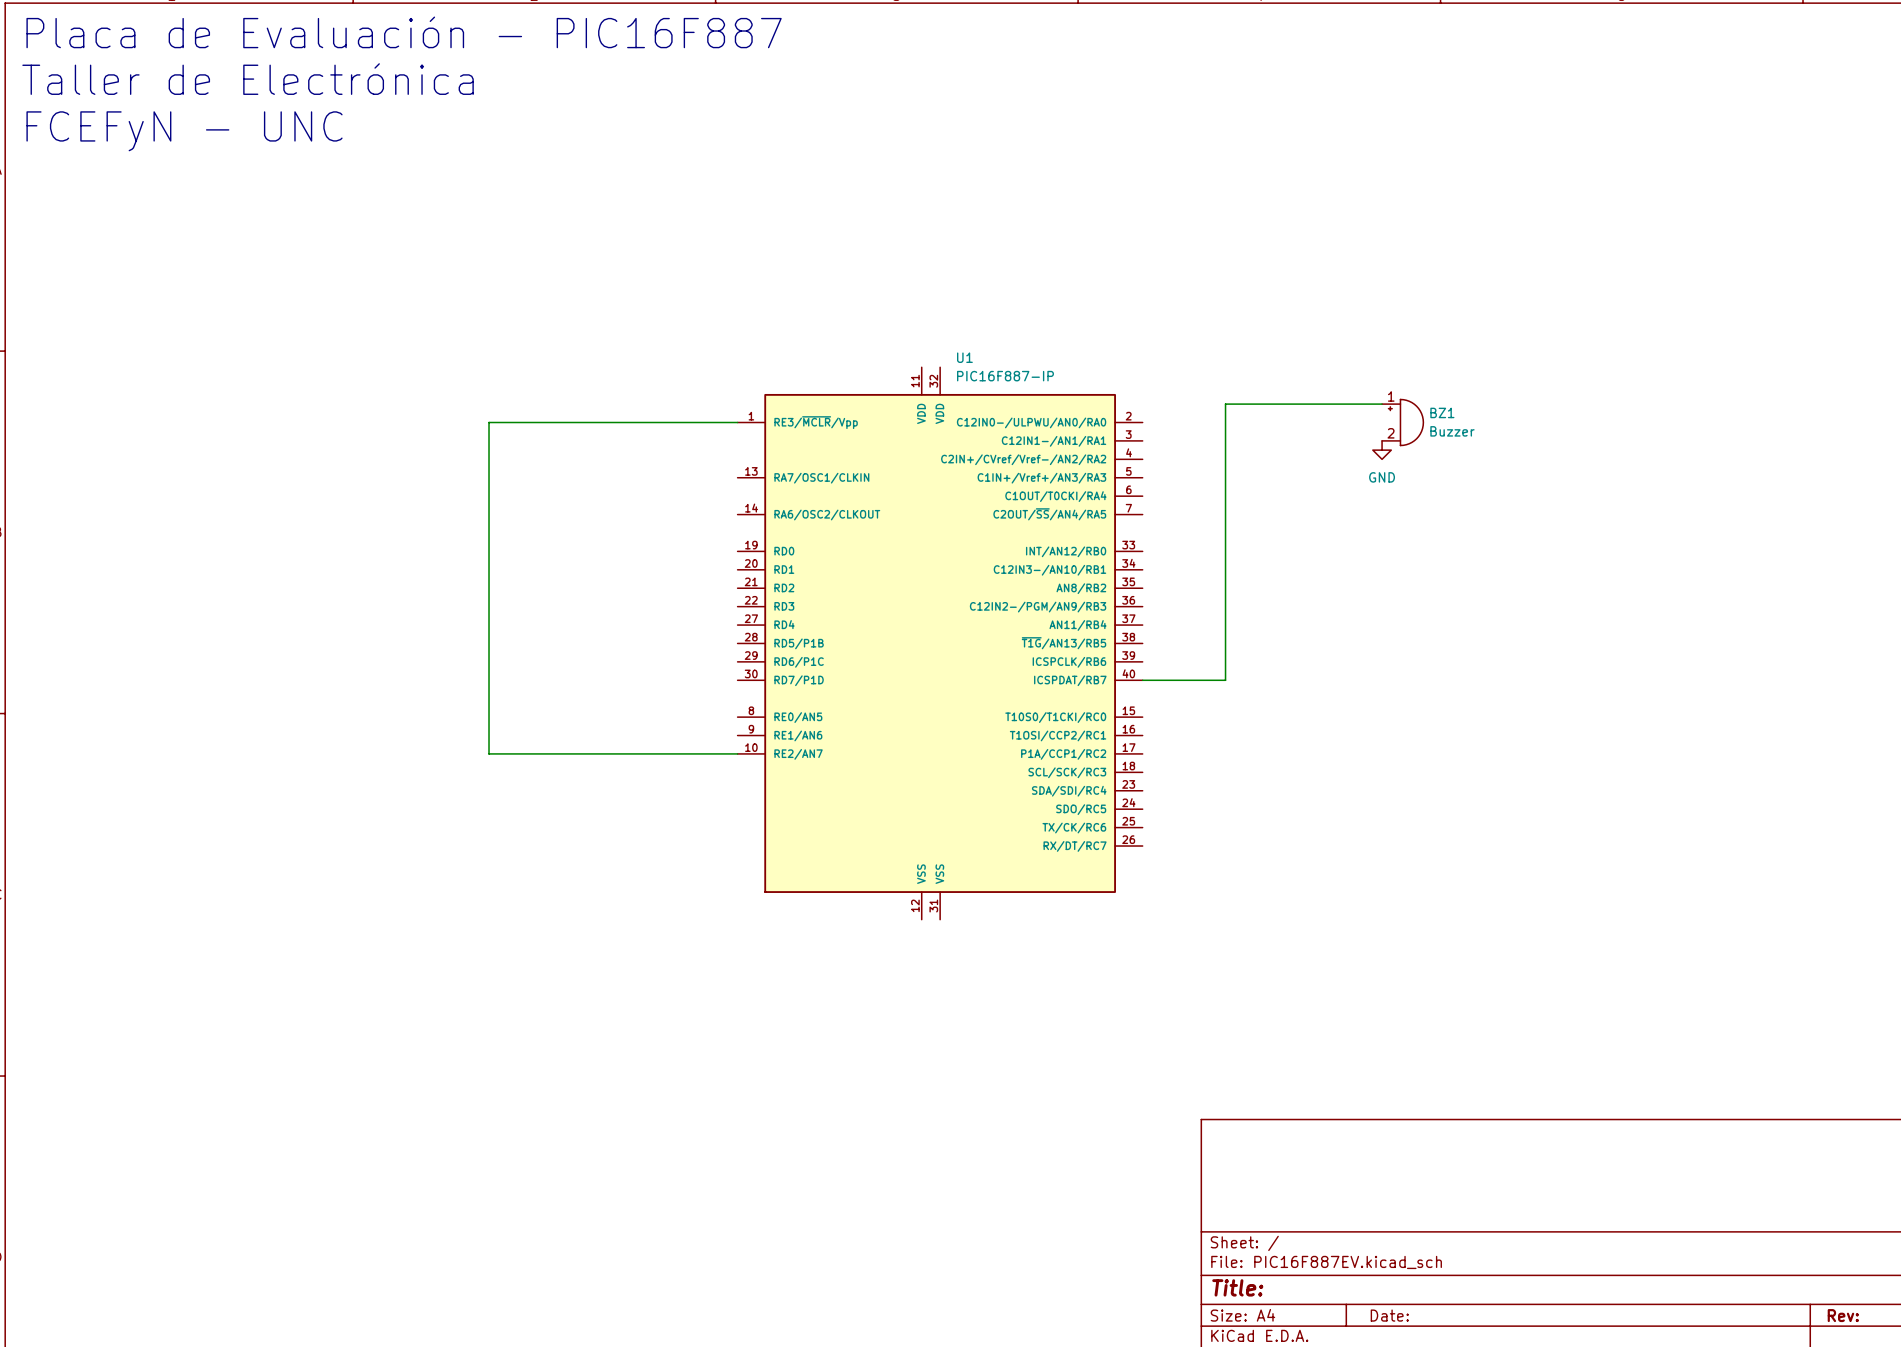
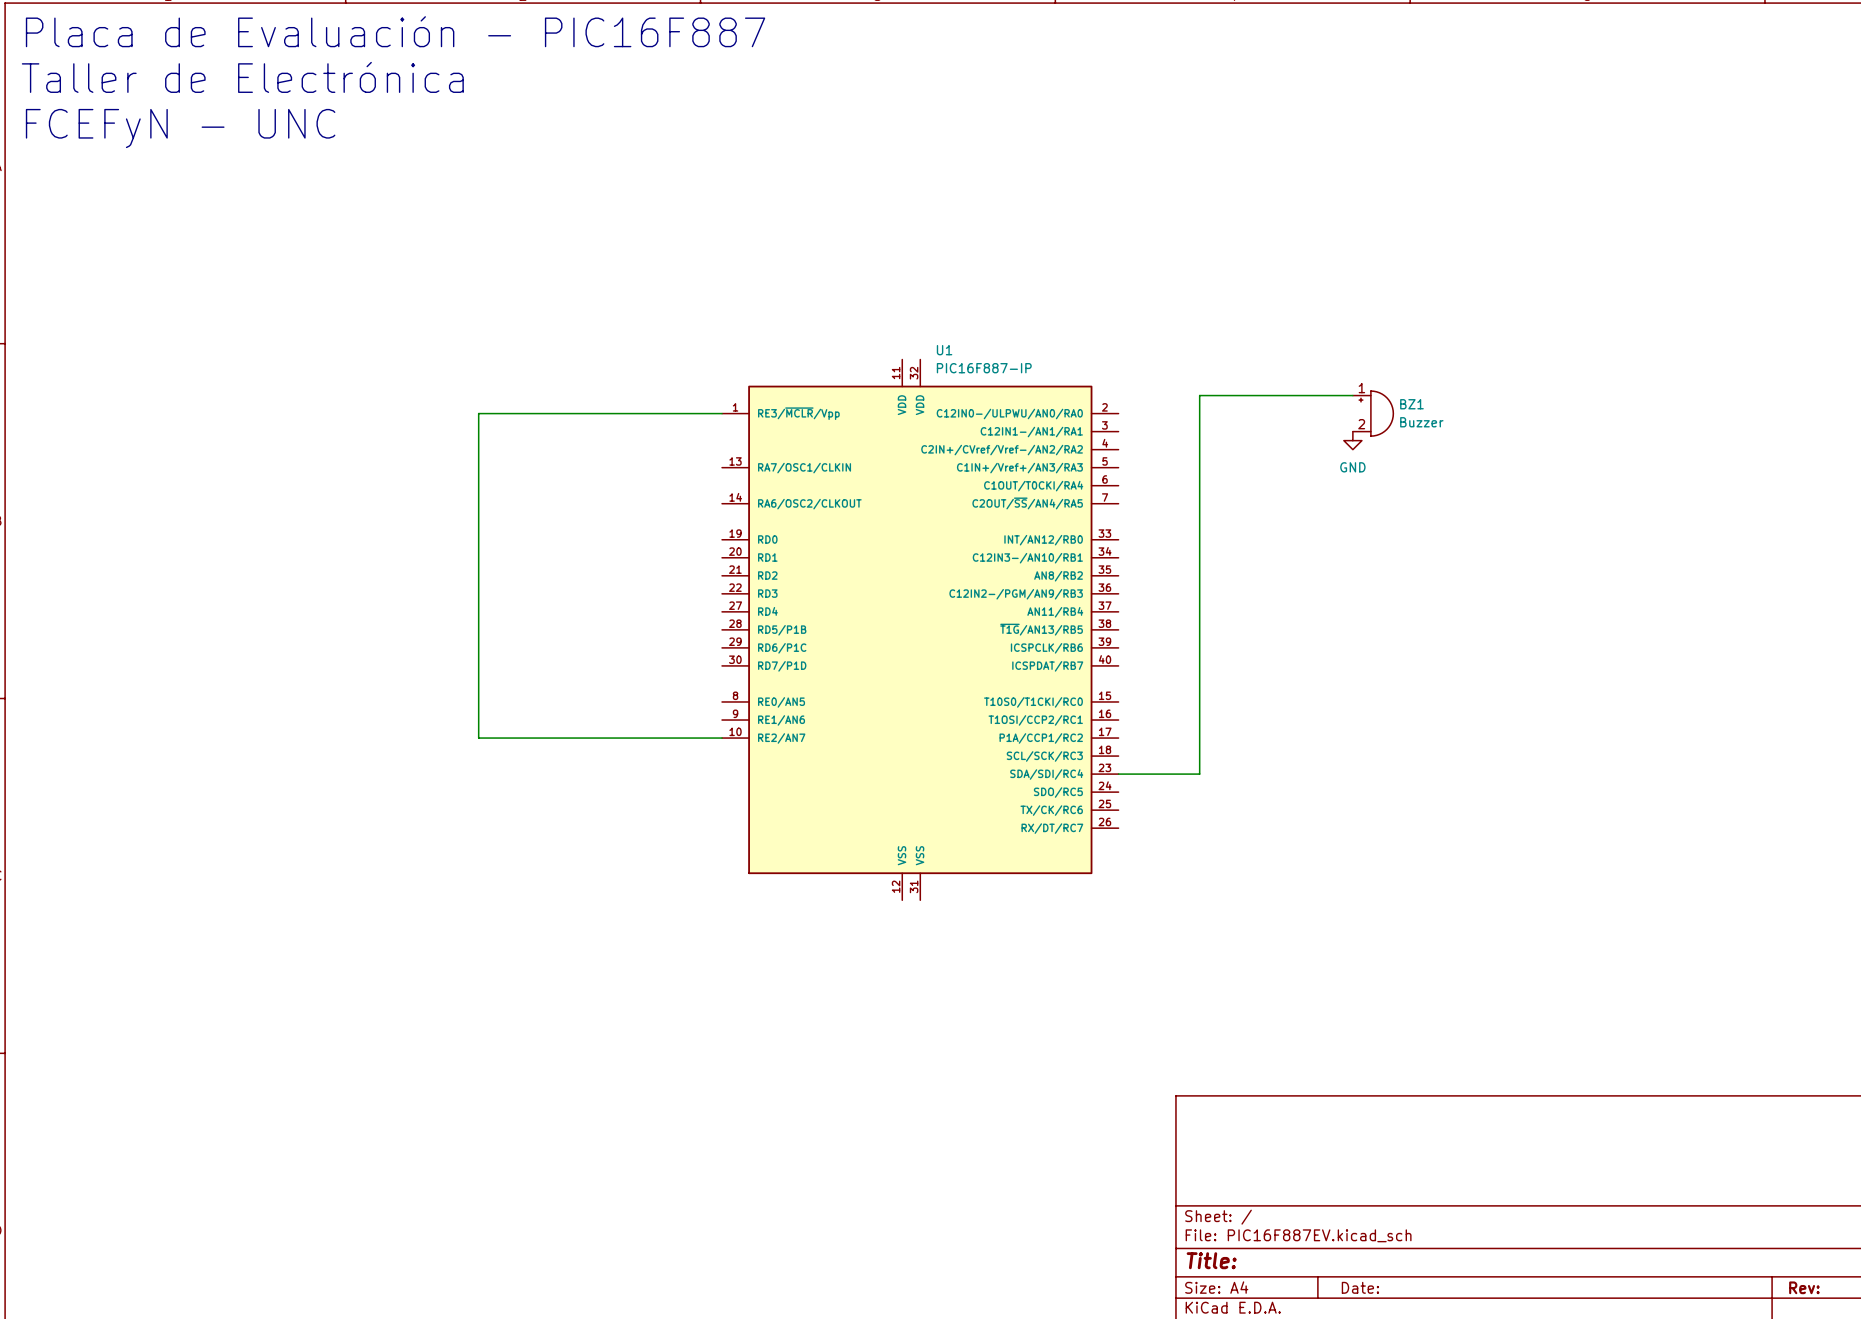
wire: (1142, 680) (1225, 680) -> (1118, 774) (1199, 774) (1199, 665)

